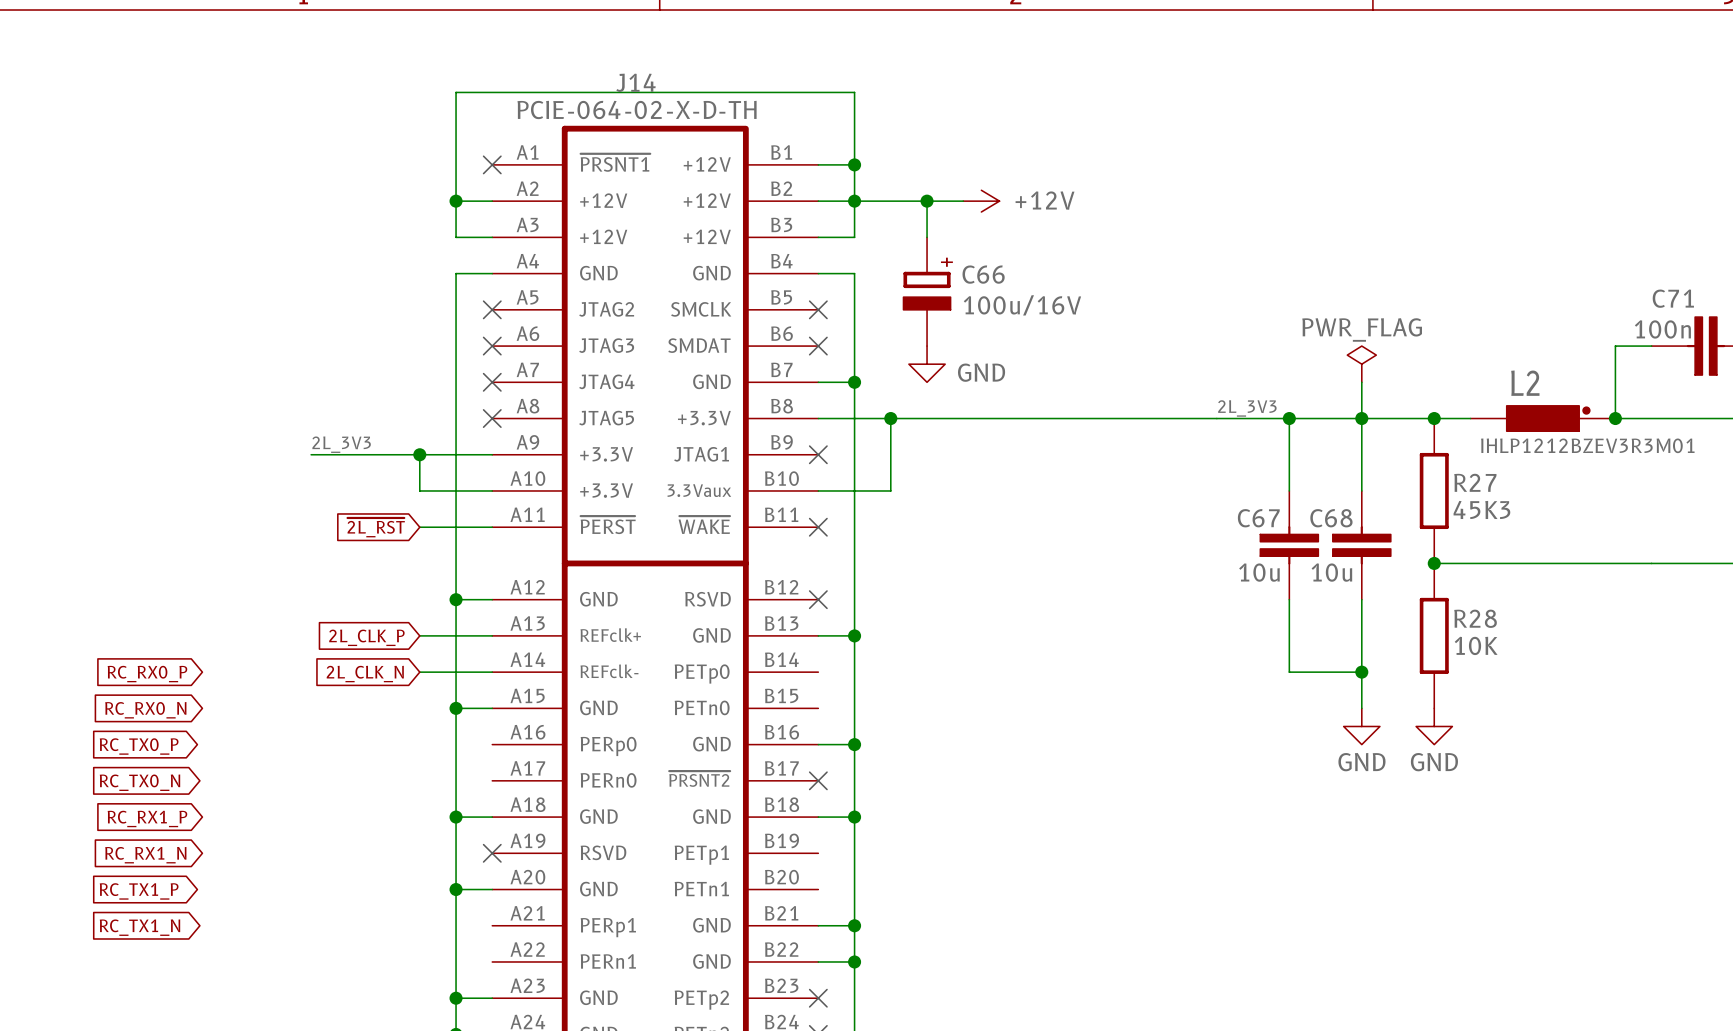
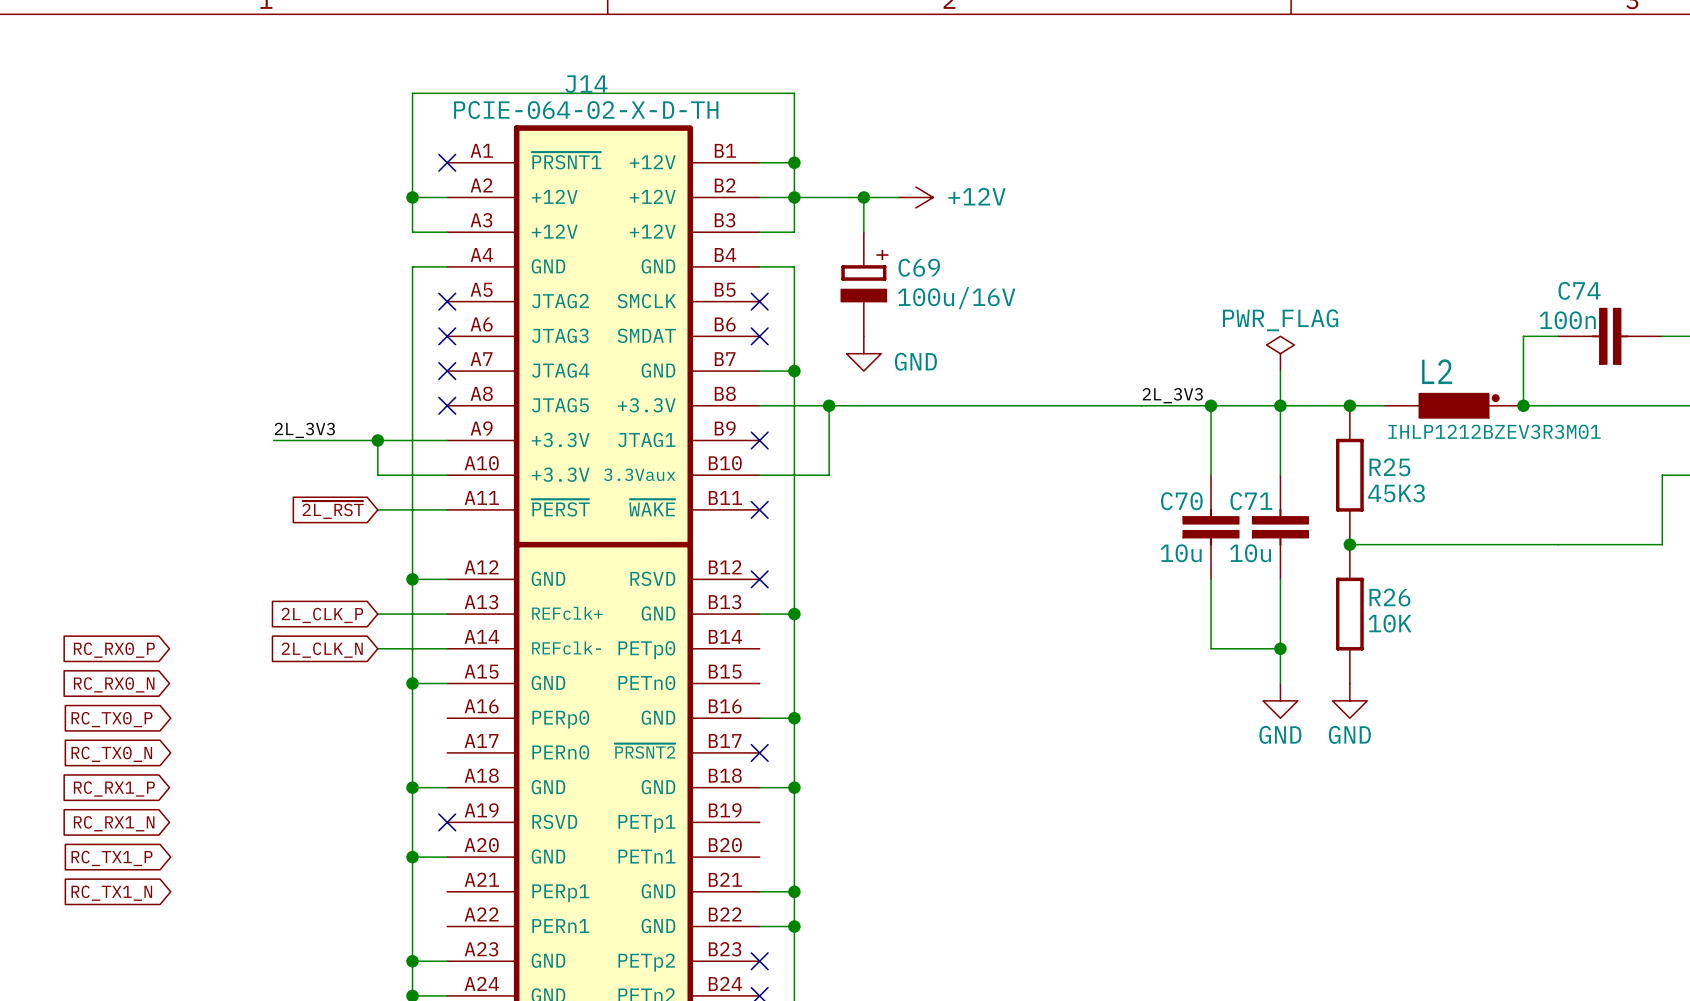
C66 name: C66 (983, 274) -> C69 (919, 267)
C71 name: C71 (1673, 298) -> C74 (1579, 290)
R27 name: R27 (1475, 482) -> R25 (1389, 467)
C67 name: C67 (1258, 518) -> C70 (1181, 501)
C68 name: C68 (1331, 518) -> C71 (1251, 501)
R28 name: R28 (1475, 618) -> R26 (1389, 597)

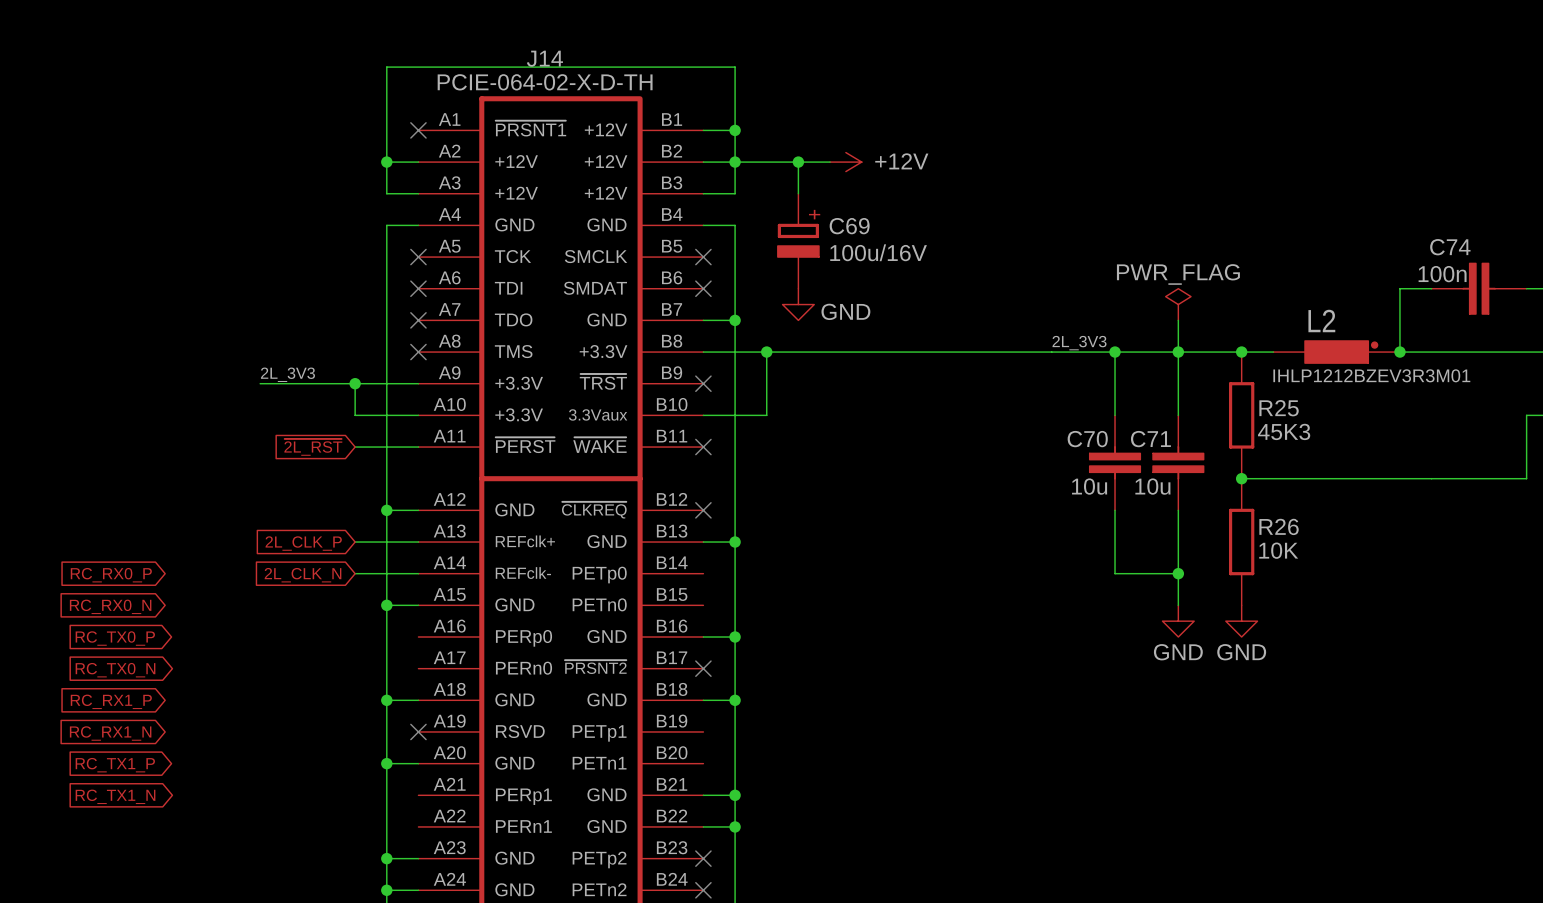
J14 pin name: JTAG2 (560, 301) -> TCK (512, 256)
J14 pin name: JTAG3 (560, 335) -> TDI (508, 288)
J14 pin name: JTAG4 (560, 370) -> TDO (513, 319)
J14 pin name: JTAG5 (560, 405) -> TMS (513, 351)
J14 pin name: JTAG1 (646, 439) -> ~{TRST} (603, 381)
J14 pin name: RSVD (652, 578) -> ~{CLKREQ} (594, 510)

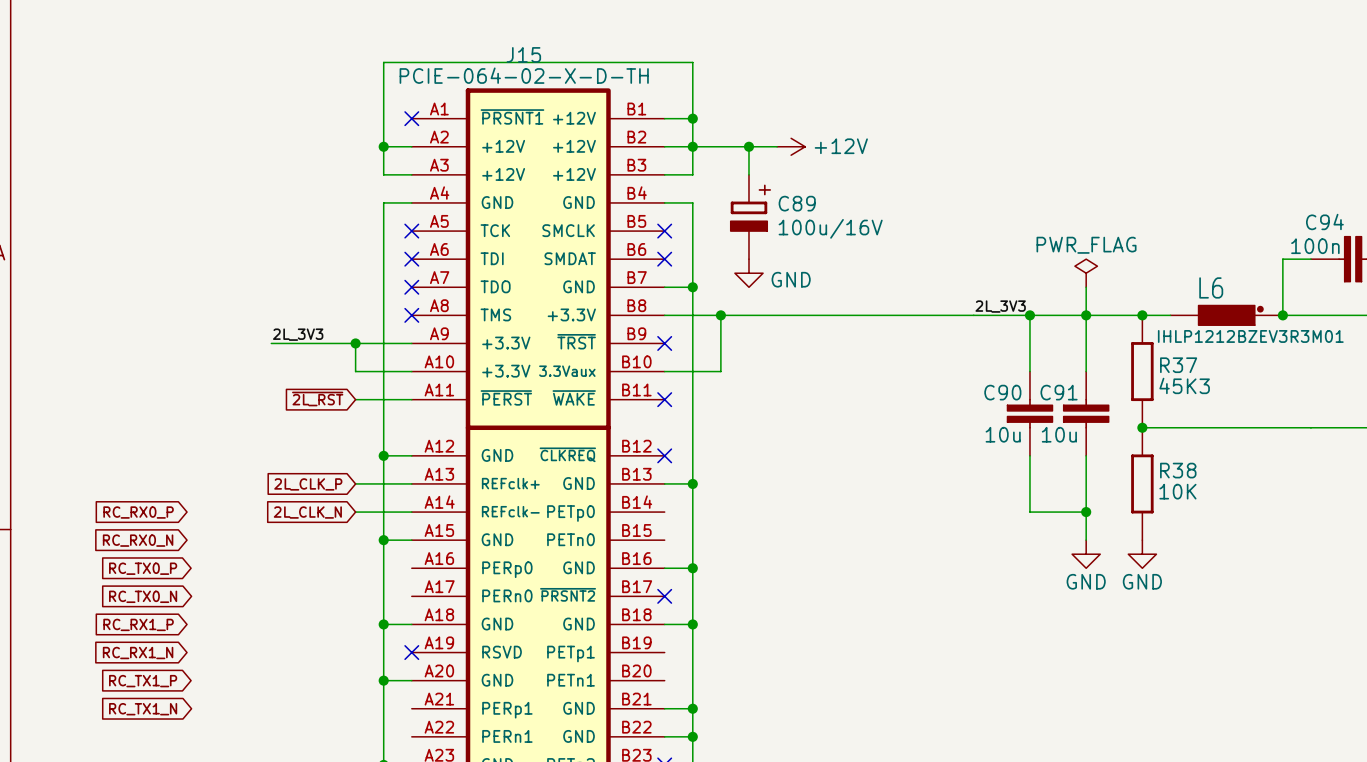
J14 name: J14 (544, 58) -> J15 (523, 54)
C69 name: C69 (849, 226) -> C89 (797, 203)
C74 name: C74 (1450, 247) -> C94 (1324, 221)
L2 name: L2 (1321, 320) -> L6 (1211, 287)
R25 name: R25 (1279, 408) -> R37 (1178, 365)
C70 name: C70 (1087, 439) -> C90 (1002, 392)
C71 name: C71 (1150, 439) -> C91 (1059, 392)
R26 name: R26 (1279, 526) -> R38 (1178, 470)

